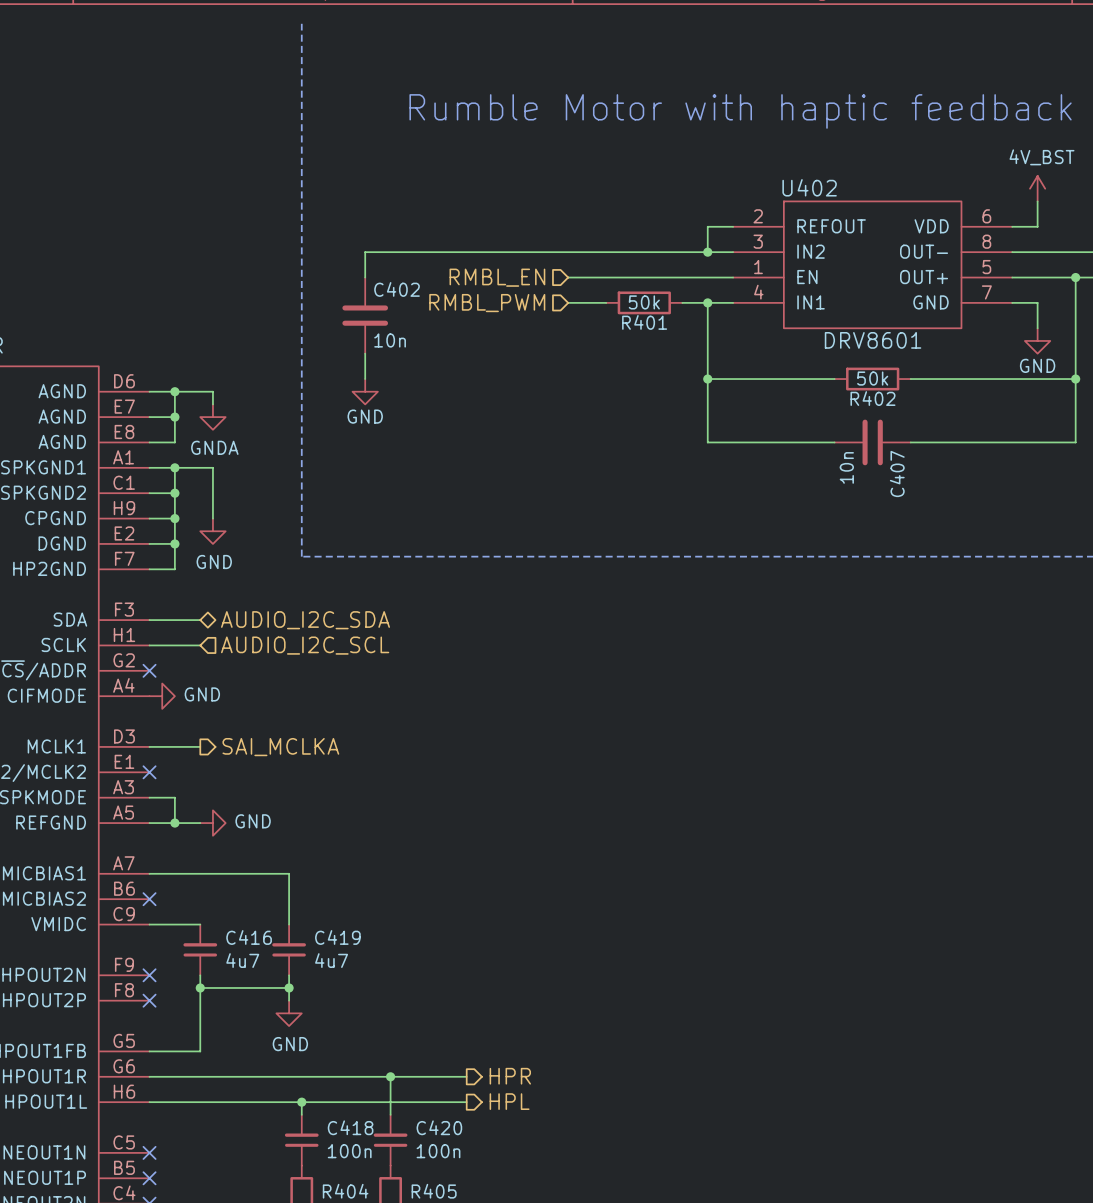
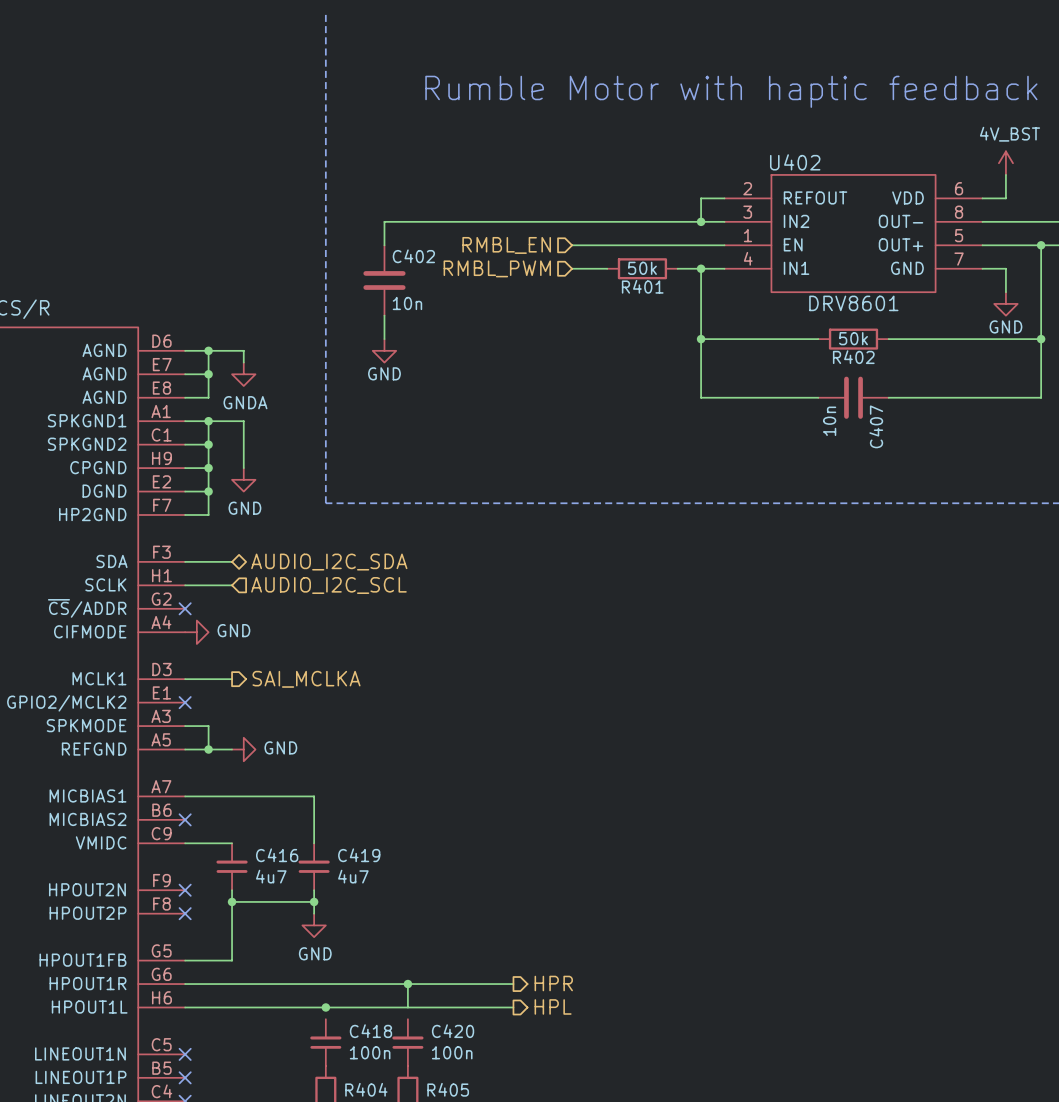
wire: none -> (478, 984) (513, 984)
hierarchical label position: HPR (510, 1076) -> HPR (553, 983)
hierarchical label position: HPL (509, 1101) -> HPL (553, 1006)
wire: (301, 1102) (301, 1114) -> none
wire: (390, 1102) (390, 1114) -> none
wire: none -> (478, 1007) (513, 1007)

